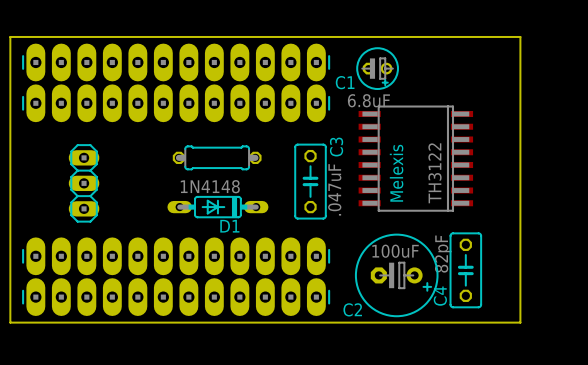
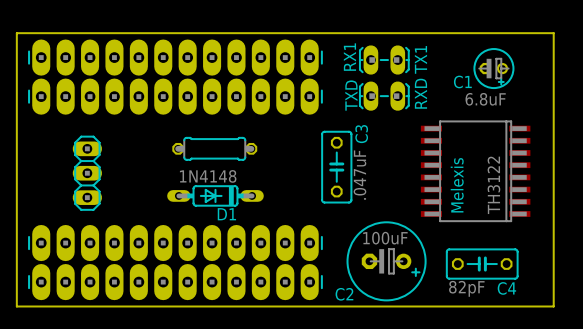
board edge: (520, 36) (520, 322) -> (504, 33) (553, 33) (553, 306) (504, 306)
text: none -> RX1 (349, 57)
text: none -> TX1 (420, 59)
part: none -> (384, 60)
C1 position: (377, 68) -> (493, 68)
text: none -> RXD (420, 93)
text: none -> TXD (351, 95)
part: none -> (384, 96)
part position: (415, 158) -> (475, 171)
C3 position: (310, 181) -> (336, 167)
C4 rotation: 0° (465, 270) -> 90° counterclockwise (482, 264)

